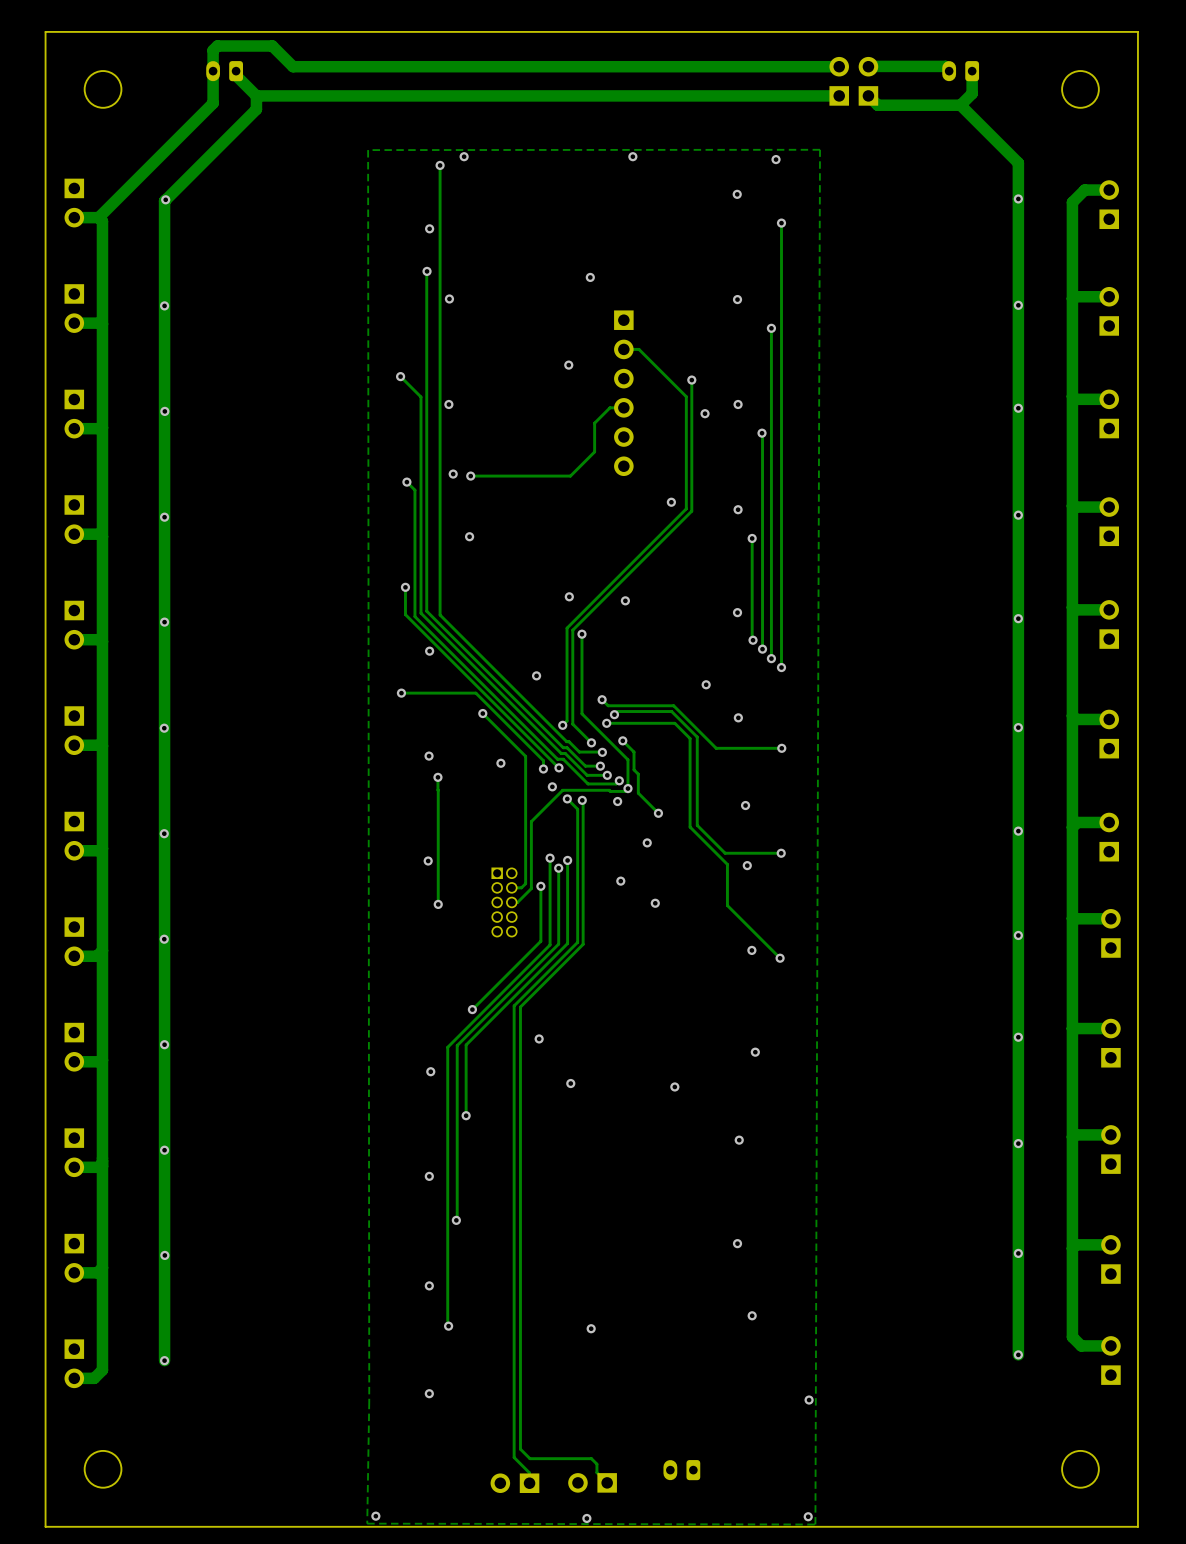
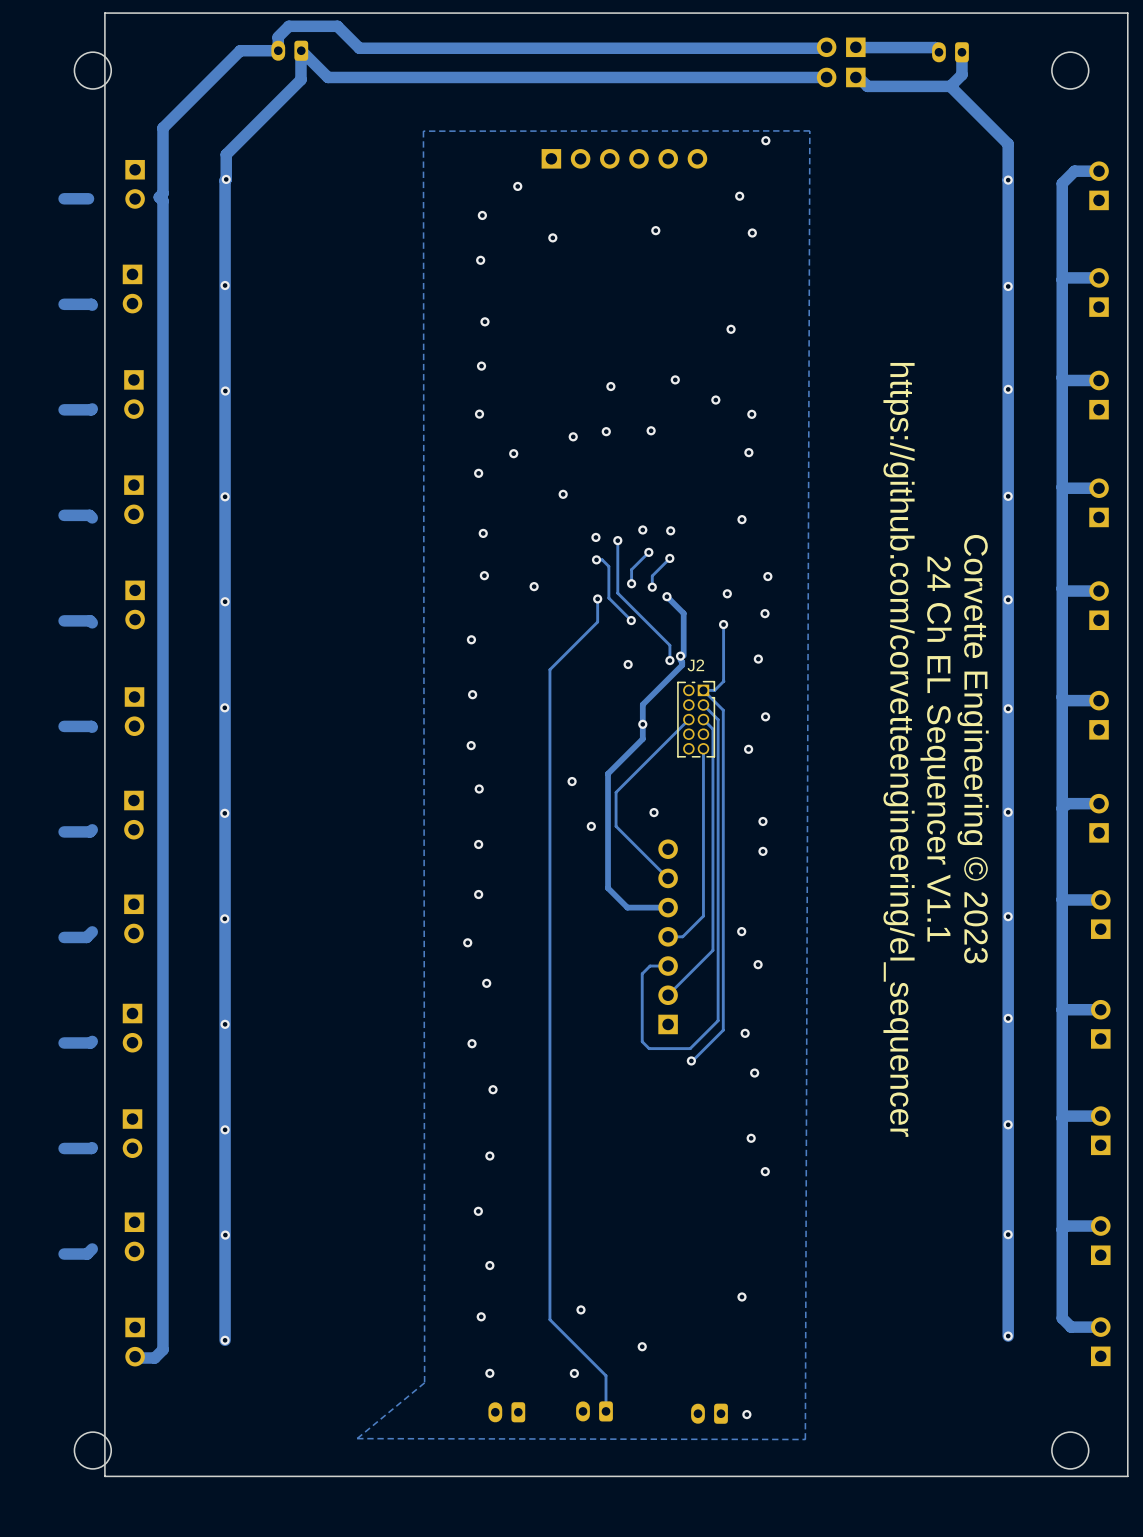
board edge: (115, 31) (45, 31) (45, 1526) (1137, 1526) (1137, 1495) -> (104, 13) (104, 1476) (1127, 1476)
track: (839, 66) (293, 66) (272, 46) (217, 46) (213, 50) (213, 103) (98, 217) (102, 221) (102, 1370) (94, 1378) (74, 1378) -> (829, 48) (359, 48) (337, 26) (288, 26) (277, 37) (278, 50) (240, 50) (162, 128) (162, 193) (159, 197) (162, 200) (162, 1349) (154, 1358) (134, 1358)
part: none -> (841, 47)
part position: (224, 71) -> (289, 50)
track: (236, 71) (236, 75) (256, 95) -> none
track: none -> (300, 52) (300, 79) (226, 154) (225, 1340)
part: (839, 81) -> none
part: (868, 81) -> none
track: (256, 95) (256, 109) (164, 200) (164, 1360) -> none
track: (839, 95) (256, 95) -> (829, 77) (328, 77) (301, 50)
part: none -> (841, 77)
zone outline: (820, 149) (815, 1524) (367, 1523) (369, 1401) (368, 150) (433, 150) -> (809, 130) (805, 1439) (357, 1438) (424, 1382) (423, 131)
via: (464, 156) -> none
via: (632, 156) -> none
track: (440, 165) (440, 615) (566, 741) (579, 752) (604, 752) (602, 752) -> none
via: (440, 165) -> none
via: (737, 194) -> none
via: none -> (226, 179)
via: (165, 199) -> none
part: (74, 203) -> none
part: none -> (135, 184)
via: none -> (517, 186)
via: none -> (739, 196)
track: (781, 223) (781, 667) -> none
via: (781, 223) -> none
via: (429, 228) -> none
via: none -> (482, 215)
via: none -> (655, 230)
via: none -> (752, 233)
track: (427, 271) (426, 611) (563, 747) (567, 747) (585, 766) (600, 766) -> none
via: (427, 271) -> none
via position: (590, 277) -> (552, 237)
via: none -> (480, 260)
via: (449, 298) -> none
via: (737, 299) -> none
via: none -> (225, 285)
via: (164, 305) -> none
part: none -> (132, 289)
part: (74, 308) -> none
track: (771, 328) (771, 658) -> none
via: (771, 328) -> none
via: none -> (484, 321)
via: none -> (731, 329)
track: (623, 349) (639, 349) (686, 396) (686, 508) (567, 628) (567, 721) (562, 725) -> none
via: (568, 365) -> none
track: (400, 376) (421, 397) (421, 613) (561, 753) (565, 753) (587, 775) (607, 775) -> none
via: (400, 376) -> none
track: (691, 380) (691, 511) (572, 630) (572, 724) (591, 742) -> none
via: (691, 380) -> none
via: none -> (481, 366)
part rotation: 0° (623, 393) -> 90° counterclockwise (624, 158)
part position: (623, 393) -> (624, 158)
via: none -> (675, 379)
via: (448, 404) -> none
via: (738, 404) -> none
via: none -> (610, 386)
track: (623, 407) (609, 407) (594, 423) (594, 451) (570, 476) (470, 476) -> none
via: none -> (225, 391)
via: (164, 411) -> none
part: none -> (133, 394)
via: (705, 413) -> none
part: (74, 414) -> none
via: none -> (715, 400)
via: none -> (479, 414)
track: (762, 433) (762, 649) -> none
via: none -> (651, 430)
via: none -> (606, 431)
via: none -> (573, 436)
via: none -> (748, 452)
via: none -> (513, 453)
via: (453, 474) -> none
via: (470, 476) -> none
track: (406, 482) (414, 490) (414, 616) (557, 759) (563, 759) (588, 783) (616, 783) (619, 780) -> none
via: (406, 482) -> none
via: none -> (478, 473)
via: (671, 502) -> none
via: (738, 509) -> none
via: none -> (563, 494)
via: none -> (225, 496)
via: (164, 517) -> none
part: none -> (133, 499)
part: (74, 519) -> none
via: (469, 536) -> none
track: (752, 538) (753, 640) -> none
via: none -> (642, 529)
via: none -> (670, 530)
via: none -> (483, 533)
via: none -> (595, 537)
track: none -> (617, 540) (617, 593) (669, 645) (669, 660)
via: none -> (617, 540)
track: none -> (648, 552) (631, 569) (631, 583)
via: none -> (648, 552)
track: none -> (669, 558) (652, 575) (652, 587)
via: none -> (669, 558)
track: none -> (596, 559) (602, 559) (608, 566) (608, 598) (631, 620)
via: none -> (596, 559)
track: (405, 587) (405, 614) (558, 767) -> none
via: (405, 587) -> none
via: none -> (484, 575)
via: none -> (767, 576)
via: (569, 596) -> none
via: (625, 600) -> none
via: none -> (631, 583)
via: none -> (534, 586)
via: none -> (652, 587)
track: none -> (666, 596) (683, 613) (683, 655) (680, 656) (682, 665) (642, 704) (642, 738) (608, 773) (608, 888) (627, 907) (668, 907)
via: none -> (666, 596)
track: none -> (597, 598) (597, 621) (549, 669) (549, 1319) (606, 1375) (606, 1411)
via: none -> (597, 598)
via: none -> (225, 601)
via: (164, 622) -> none
part: none -> (135, 604)
part: (74, 625) -> none
via: none -> (764, 613)
track: (581, 634) (581, 713) (627, 759) (627, 788) (625, 791) (562, 790) (531, 821) (531, 888) (517, 902) (511, 902) -> none
via: (581, 634) -> none
via: none -> (631, 620)
via: (753, 640) -> none
track: none -> (723, 624) (723, 681) (714, 690) (703, 690) (723, 710) (723, 1030) (691, 1060)
via: none -> (723, 624)
via: (762, 649) -> none
via: (429, 651) -> none
via: none -> (471, 639)
via: (771, 658) -> none
via: (781, 667) -> none
via: none -> (680, 656)
via: (536, 675) -> none
via: none -> (758, 659)
via: none -> (669, 660)
via: none -> (628, 664)
via: (706, 684) -> none
track: (401, 693) (475, 693) (543, 760) (543, 769) -> none
via: (401, 693) -> none
track: (602, 699) (608, 705) (673, 705) (716, 748) (781, 748) -> none
via: (602, 699) -> none
track: (482, 713) (525, 756) (525, 883) (521, 887) (511, 887) -> none
track: (614, 714) (617, 711) (671, 711) (697, 737) (697, 825) (725, 853) (781, 853) -> none
via: (614, 714) -> none
via: (738, 717) -> none
track: (606, 723) (674, 723) (690, 738) (690, 827) (727, 864) (727, 905) (780, 958) -> none
via: (606, 723) -> none
track: none -> (703, 704) (718, 719) (718, 1020) (690, 1048) (649, 1048) (642, 1041) (642, 973) (650, 966) (668, 966)
via: (562, 725) -> none
via: none -> (224, 707)
via: (164, 728) -> none
part: (74, 730) -> none
part: none -> (134, 711)
track: none -> (688, 719) (616, 792) (616, 826) (668, 878)
track: none -> (703, 719) (712, 729) (712, 950) (668, 995)
track: (622, 740) (634, 752) (634, 769) (638, 774) (638, 793) (658, 813) -> none
via: (622, 740) -> none
via: (591, 742) -> none
via: none -> (642, 724)
via position: (781, 748) -> (765, 716)
via: (602, 752) -> none
via: (429, 756) -> none
via position: (500, 763) -> (471, 745)
via: (600, 766) -> none
via: (558, 767) -> none
track: none -> (703, 748) (703, 916) (682, 936) (668, 936)
text: none -> 24 Ch EL Sequencer V1.1 (936, 749)
text: none -> Corvette Engineering © 2023 (973, 749)
via: none -> (748, 749)
via: (543, 769) -> none
text: none -> https://github.com/corvetteengineering/el_sequencer (899, 749)
via: (607, 775) -> none
track: (437, 777) (438, 904) -> none
via: (437, 777) -> none
via: (619, 780) -> none
via: (552, 786) -> none
via: (627, 788) -> none
track: (567, 798) (577, 809) (577, 942) (514, 1005) (514, 1457) (529, 1472) (529, 1483) -> none
via: (567, 798) -> none
track: (582, 800) (583, 944) (520, 1007) (520, 1449) (529, 1458) (591, 1458) (596, 1464) (596, 1472) (607, 1482) -> none
via: (617, 801) -> none
via: (745, 805) -> none
via: none -> (479, 789)
via: (658, 813) -> none
via: none -> (654, 812)
via: none -> (224, 813)
part: none -> (133, 815)
via: (164, 833) -> none
part: (74, 836) -> none
via: none -> (762, 821)
via: (647, 842) -> none
via: none -> (591, 826)
via: (781, 853) -> none
track: (550, 858) (550, 944) (447, 1047) (448, 1326) -> none
via: (550, 858) -> none
track: (567, 860) (567, 943) (466, 1044) (466, 1115) -> none
via: (567, 860) -> none
via: (428, 861) -> none
via: none -> (478, 844)
via: (747, 865) -> none
track: (558, 868) (558, 944) (457, 1045) (456, 1220) -> none
via: (558, 868) -> none
via: none -> (762, 851)
via: (620, 881) -> none
track: (540, 886) (540, 941) (472, 1009) -> none
via: (540, 886) -> none
J2 side: top (504, 902) -> bottom (696, 719)
via: (655, 903) -> none
via: (438, 904) -> none
via: none -> (478, 894)
part: none -> (133, 918)
via: none -> (224, 918)
via: (164, 939) -> none
part: (74, 941) -> none
part: none -> (668, 936)
via position: (780, 958) -> (758, 964)
via: none -> (467, 942)
via: none -> (486, 983)
via: (472, 1009) -> none
via: (539, 1038) -> none
via: none -> (225, 1024)
via: (164, 1044) -> none
part: none -> (132, 1028)
part: (74, 1047) -> none
via: none -> (472, 1043)
via: (430, 1071) -> none
via: (570, 1083) -> none
via position: (674, 1086) -> (691, 1060)
via: none -> (754, 1073)
via: none -> (493, 1089)
via: (466, 1115) -> none
via: (739, 1140) -> none
via: none -> (225, 1129)
via: (164, 1150) -> none
part: (74, 1152) -> none
part: none -> (132, 1133)
via: none -> (751, 1138)
via: none -> (489, 1156)
via: (429, 1176) -> none
via: none -> (765, 1171)
via: (456, 1220) -> none
via: none -> (478, 1211)
via: (737, 1243) -> none
via: none -> (225, 1235)
part: none -> (134, 1236)
via: (164, 1255) -> none
part: (74, 1258) -> none
via: none -> (489, 1265)
via: (429, 1285) -> none
via: (448, 1326) -> none
via: none -> (481, 1316)
via: none -> (225, 1340)
part: none -> (135, 1342)
via: (164, 1360) -> none
part: (74, 1363) -> none
via: none -> (642, 1346)
via: none -> (489, 1373)
via: none -> (574, 1373)
via: (429, 1393) -> none
via: (809, 1400) -> none
part: none -> (594, 1411)
part: none -> (506, 1412)
part: none -> (709, 1413)
via: none -> (746, 1414)
part: (681, 1470) -> none
part: (592, 1482) -> none
part: (514, 1483) -> none
via: (375, 1516) -> none
via: (808, 1516) -> none
via: (586, 1518) -> none

